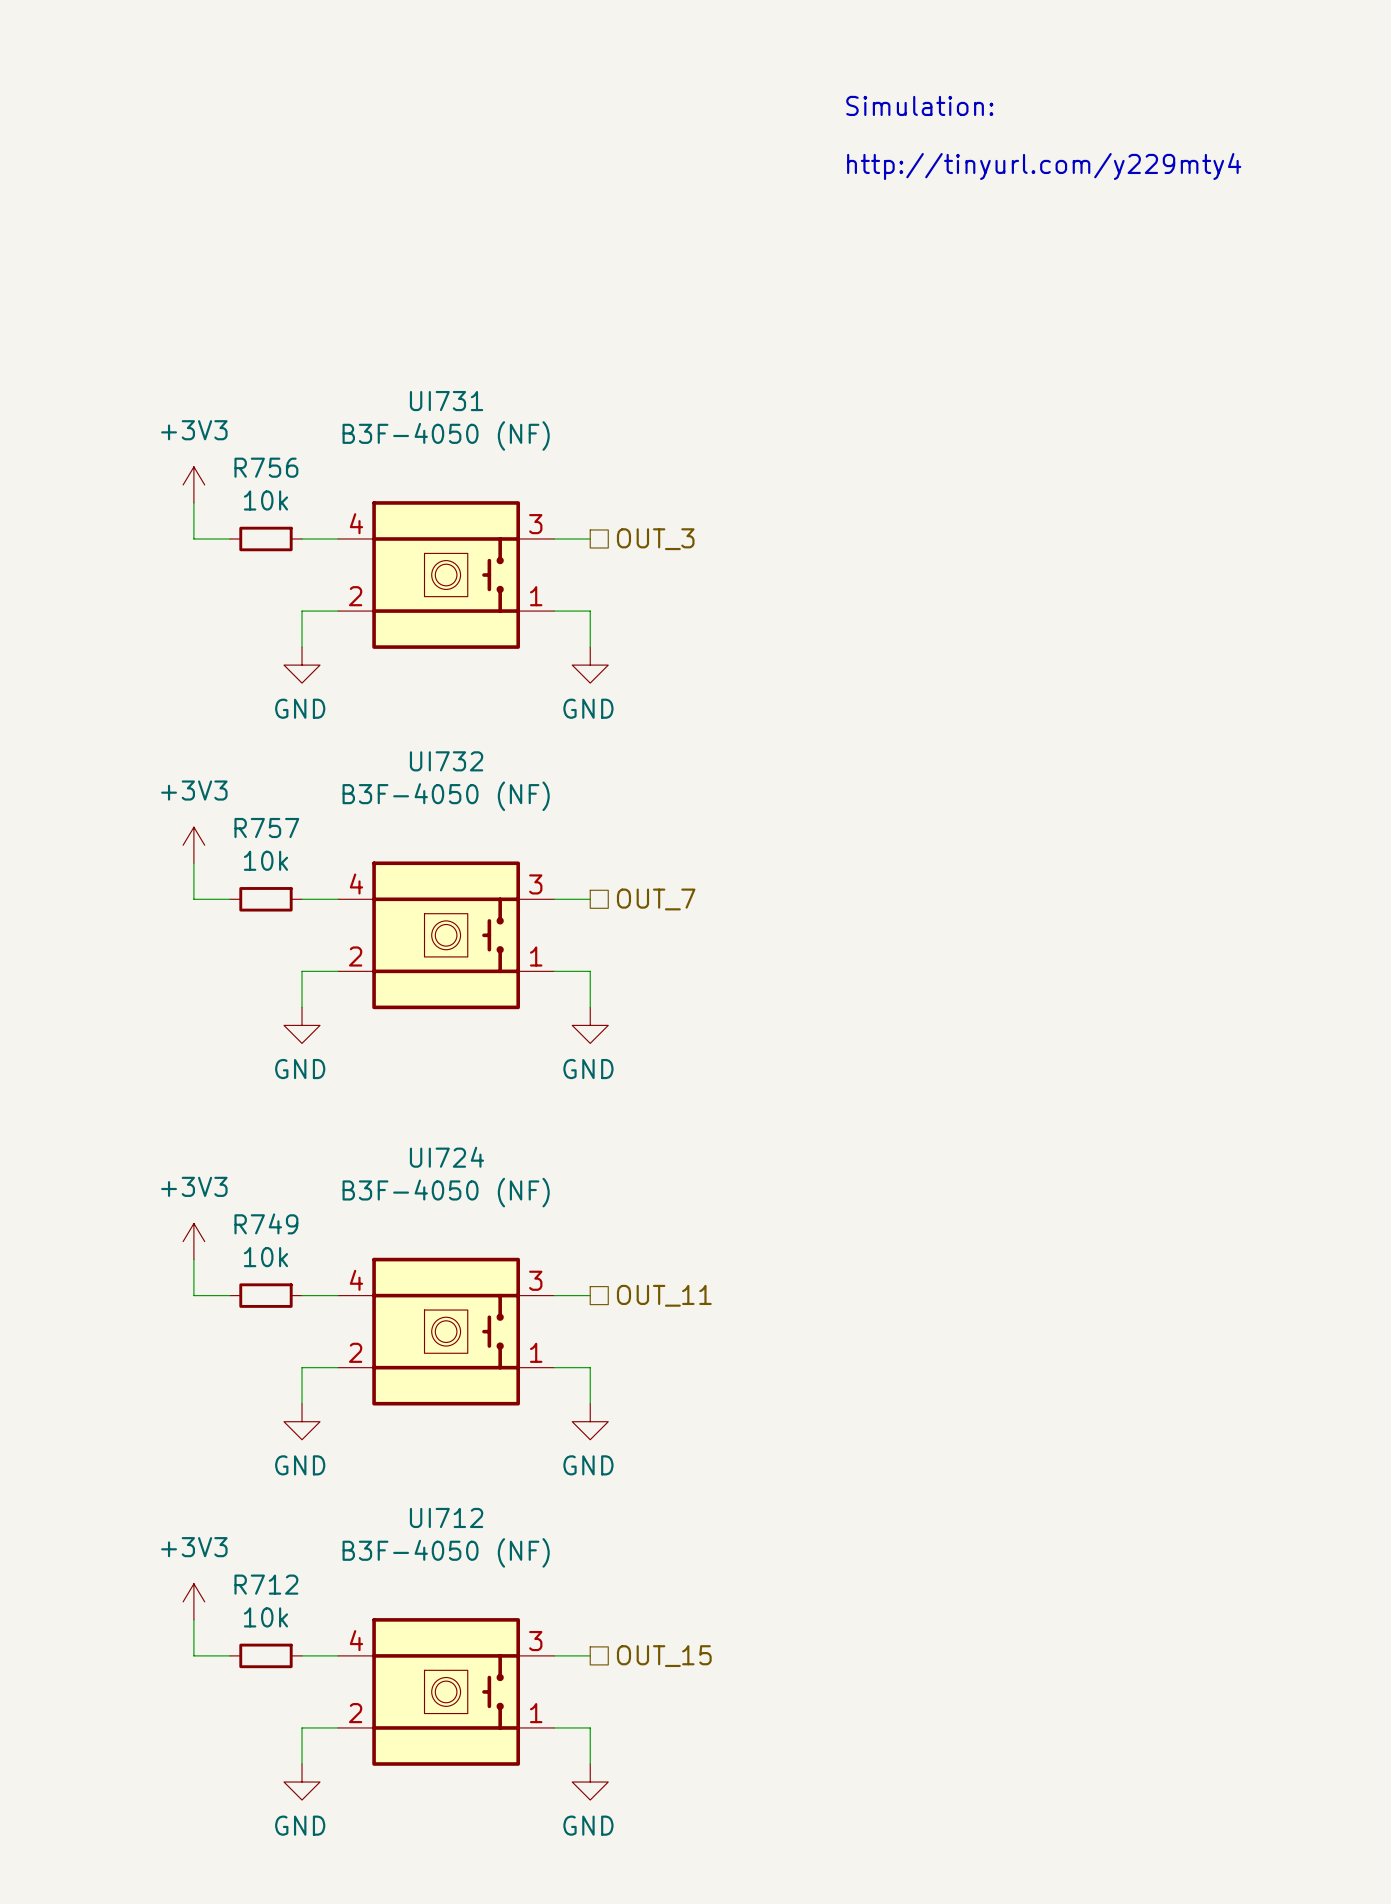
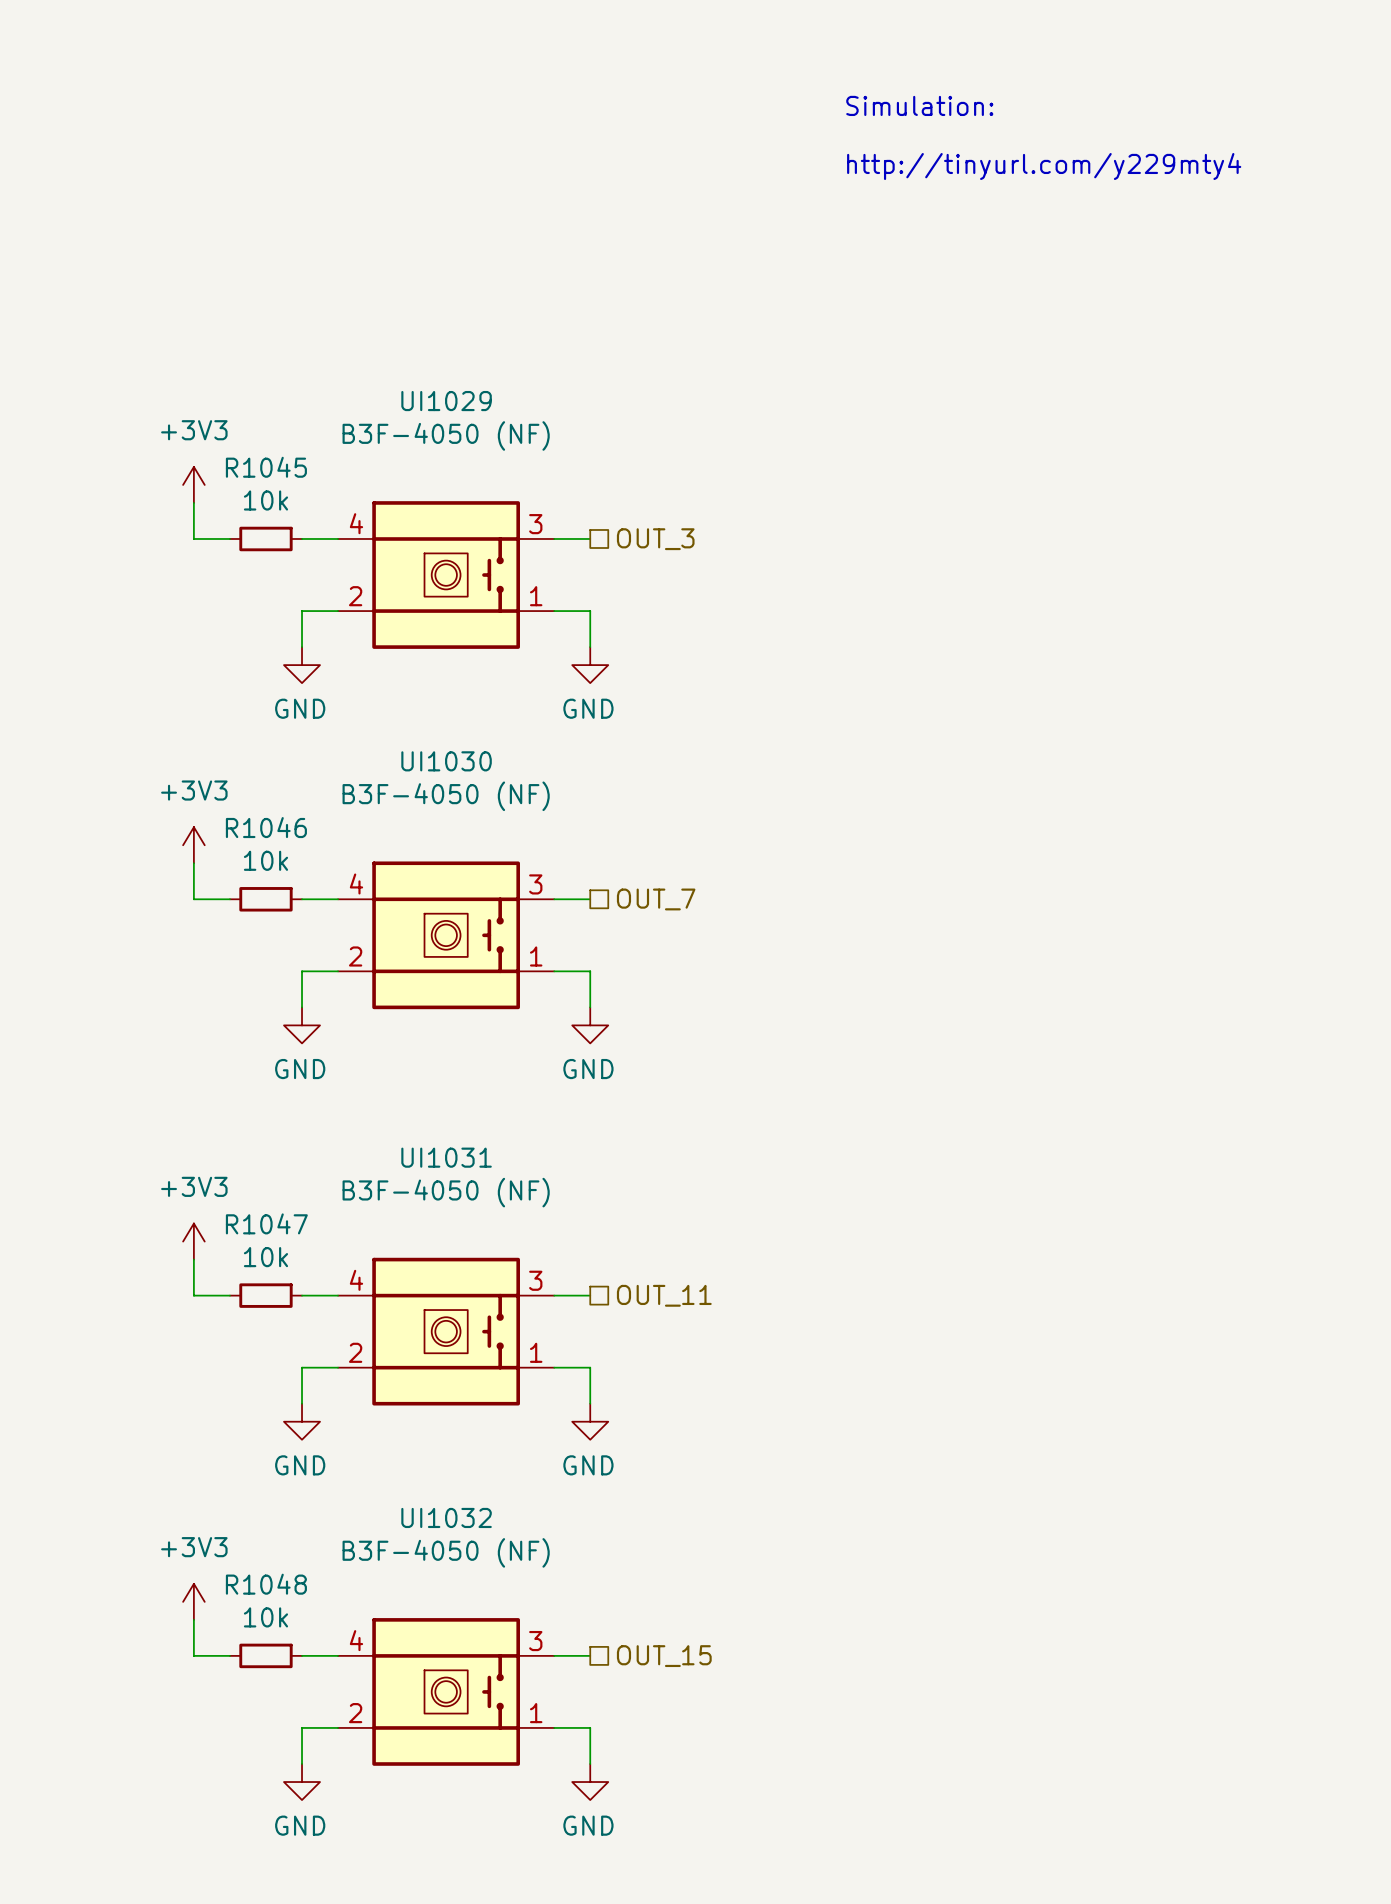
UI731 name: UI731 (446, 401) -> UI1029 (446, 401)
R756 name: R756 (266, 467) -> R1045 (266, 467)
UI732 name: UI732 (446, 761) -> UI1030 (446, 761)
R757 name: R757 (266, 827) -> R1046 (266, 827)
UI724 name: UI724 (446, 1157) -> UI1031 (446, 1157)
R749 name: R749 (266, 1223) -> R1047 (266, 1223)
UI712 name: UI712 (446, 1517) -> UI1032 (446, 1517)
R712 name: R712 (266, 1584) -> R1048 (266, 1584)

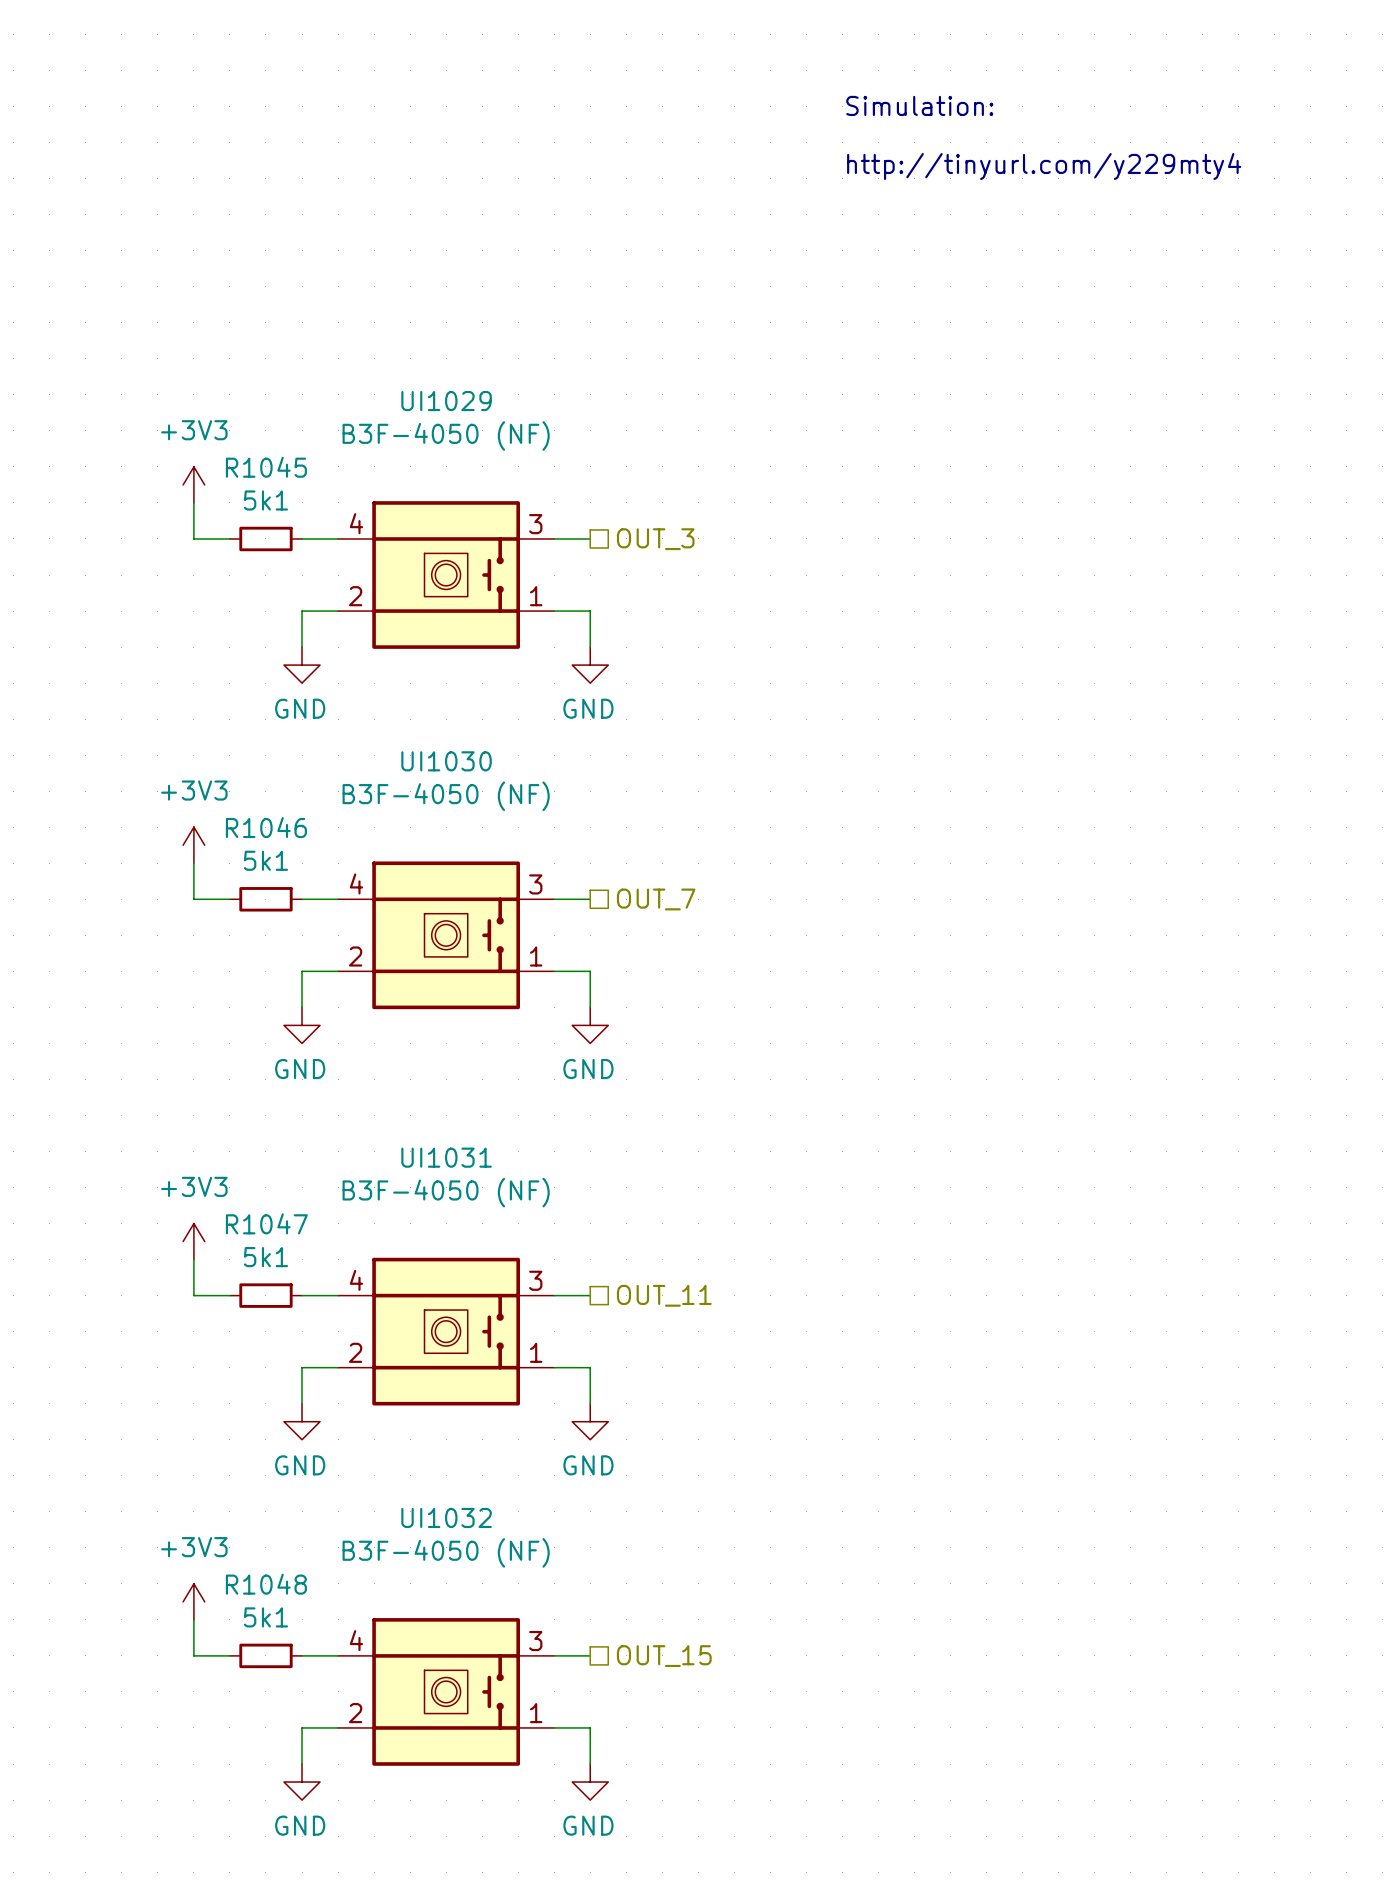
R1045 value: 10k (265, 500) -> 5k1 (265, 500)
R1046 value: 10k (265, 860) -> 5k1 (265, 860)
R1047 value: 10k (265, 1257) -> 5k1 (265, 1257)
R1048 value: 10k (265, 1617) -> 5k1 (265, 1617)

